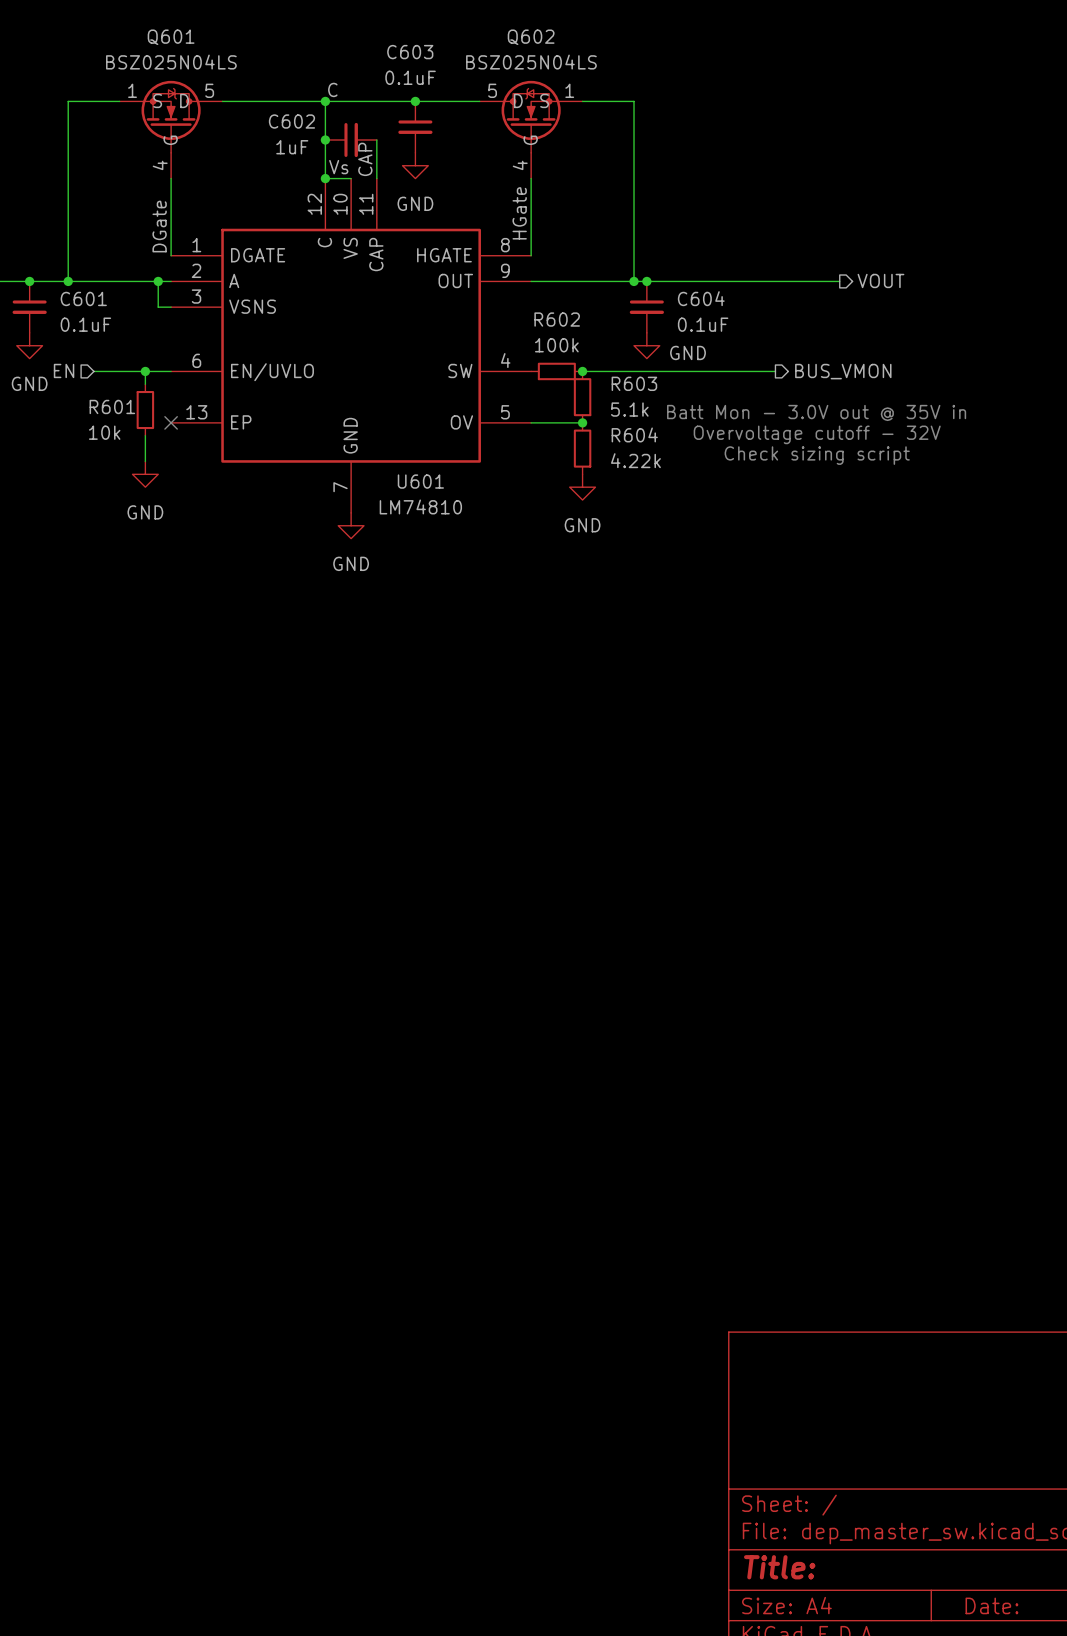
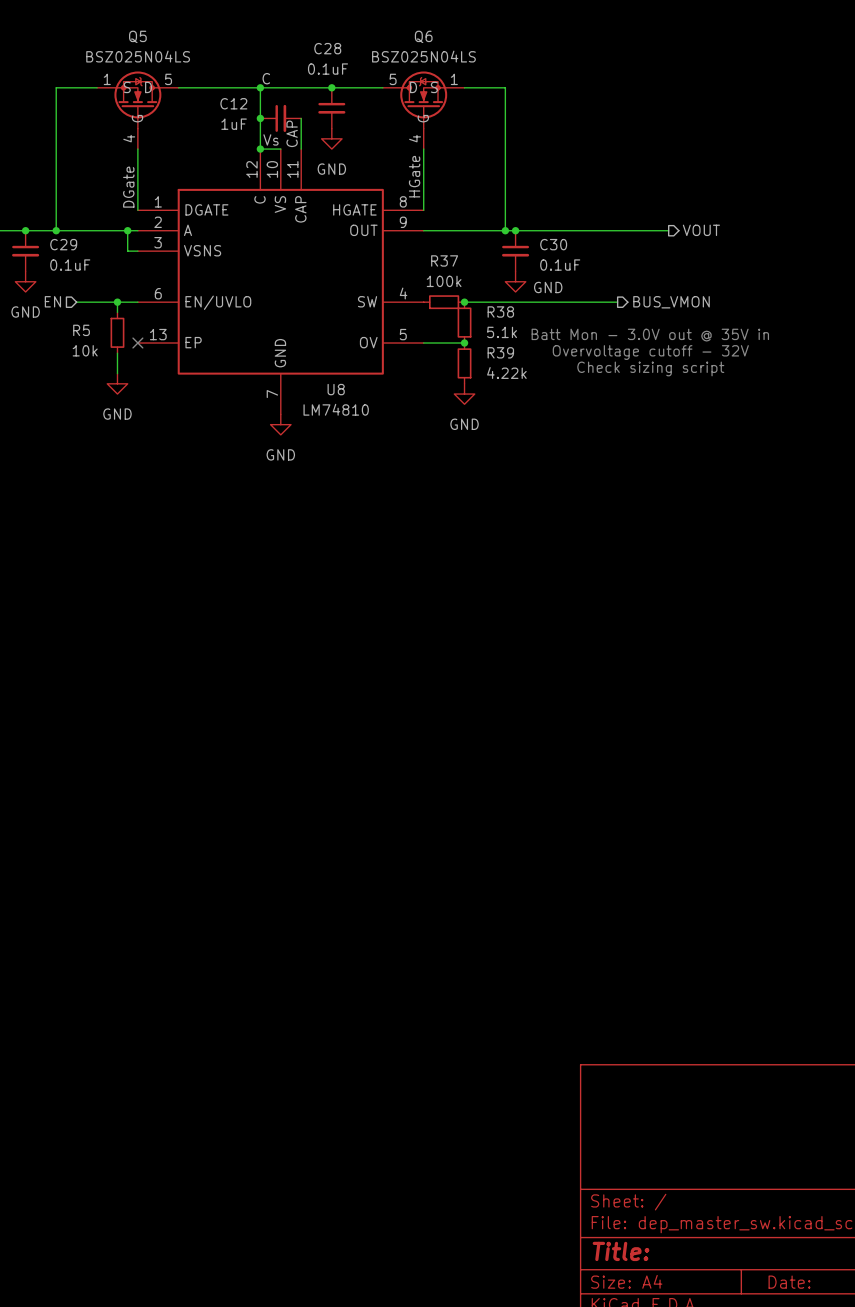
Q601 name: Q601 (171, 37) -> Q5 (137, 36)
Q602 name: Q602 (531, 37) -> Q6 (423, 36)
C603 name: C603 (410, 52) -> C28 (327, 48)
C602 name: C602 (291, 121) -> C12 (233, 103)
C601 name: C601 (83, 298) -> C29 (63, 244)
C604 name: C604 (701, 298) -> C30 (553, 244)
R602 name: R602 (557, 319) -> R37 (444, 260)
R603 name: R603 (634, 383) -> R38 (500, 312)
R601 name: R601 (112, 406) -> R5 (81, 330)
R604 name: R604 (634, 434) -> R39 (500, 352)
U601 name: U601 (420, 481) -> U8 (336, 389)

